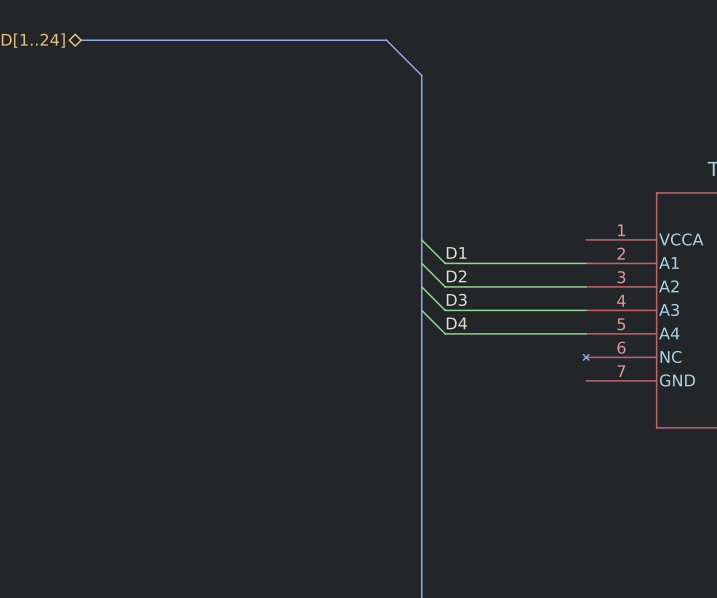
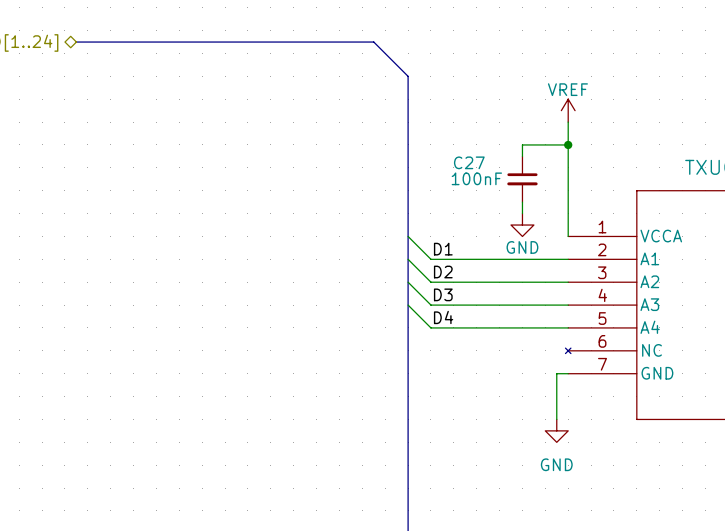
power symbol: none -> VREF (568, 110)
wire: none -> (568, 122) (568, 236)
wire: none -> (568, 144) (522, 144) (522, 156)
junction: none -> (568, 144)
C27: none -> 100nF (522, 179)
wire: none -> (522, 202) (522, 213)
power symbol: none -> GND (522, 225)
wire: none -> (568, 373) (556, 373) (556, 419)
power symbol: none -> GND (556, 430)

